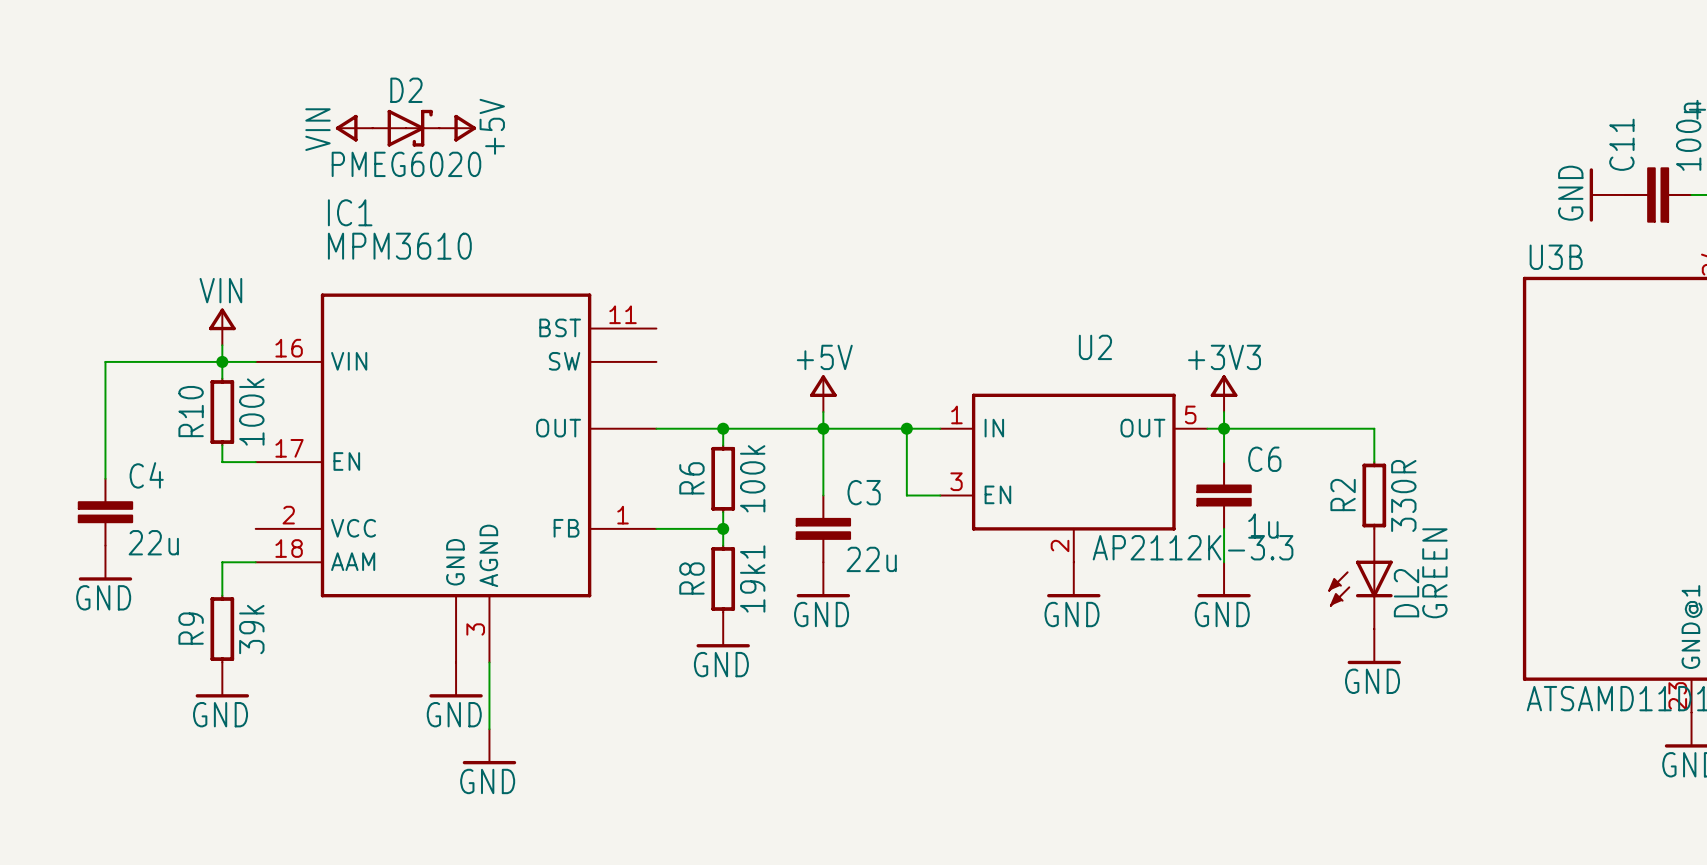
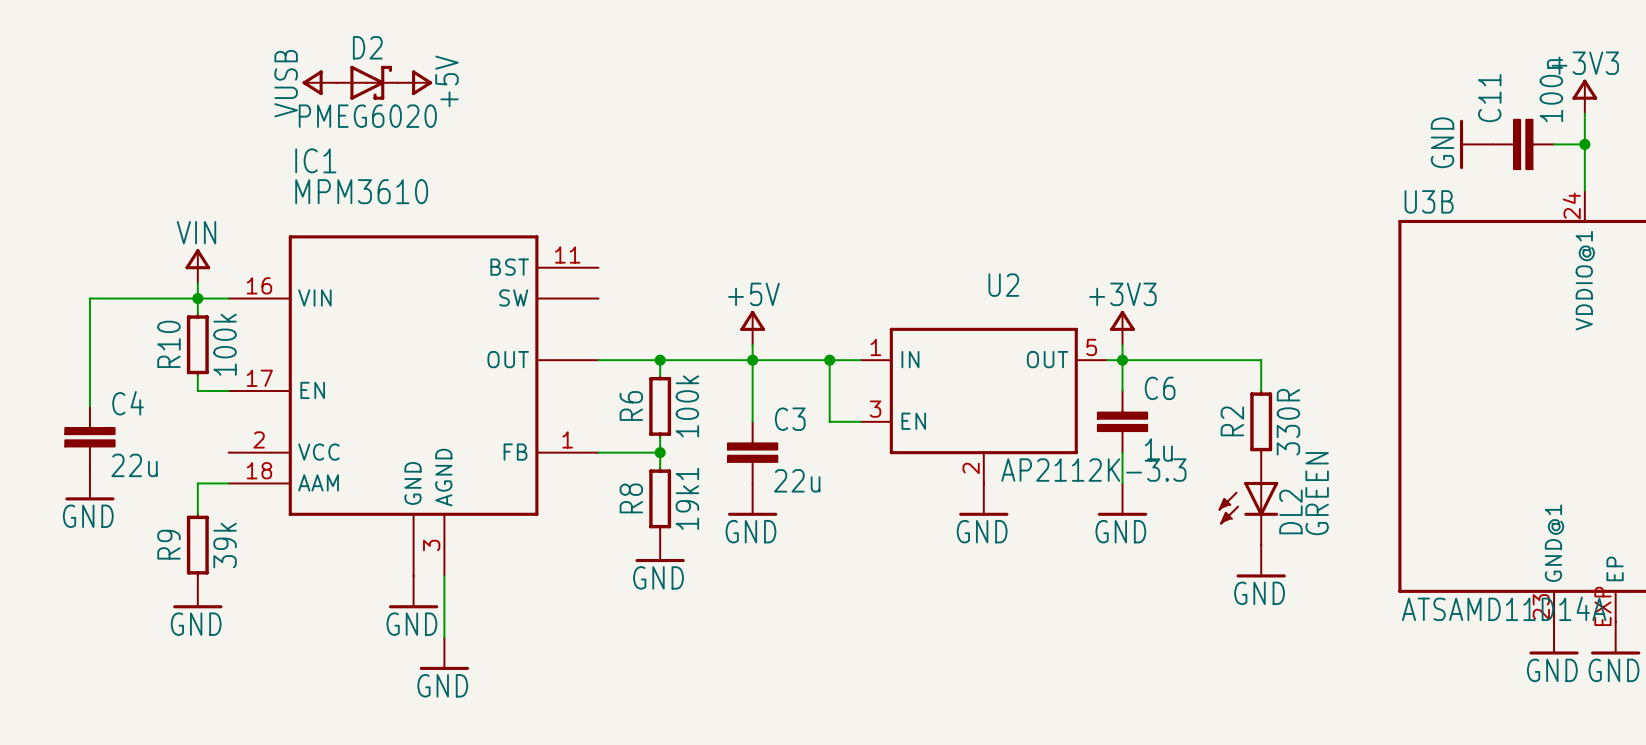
power symbol: VIN (354, 128) -> VUSB (319, 82)

